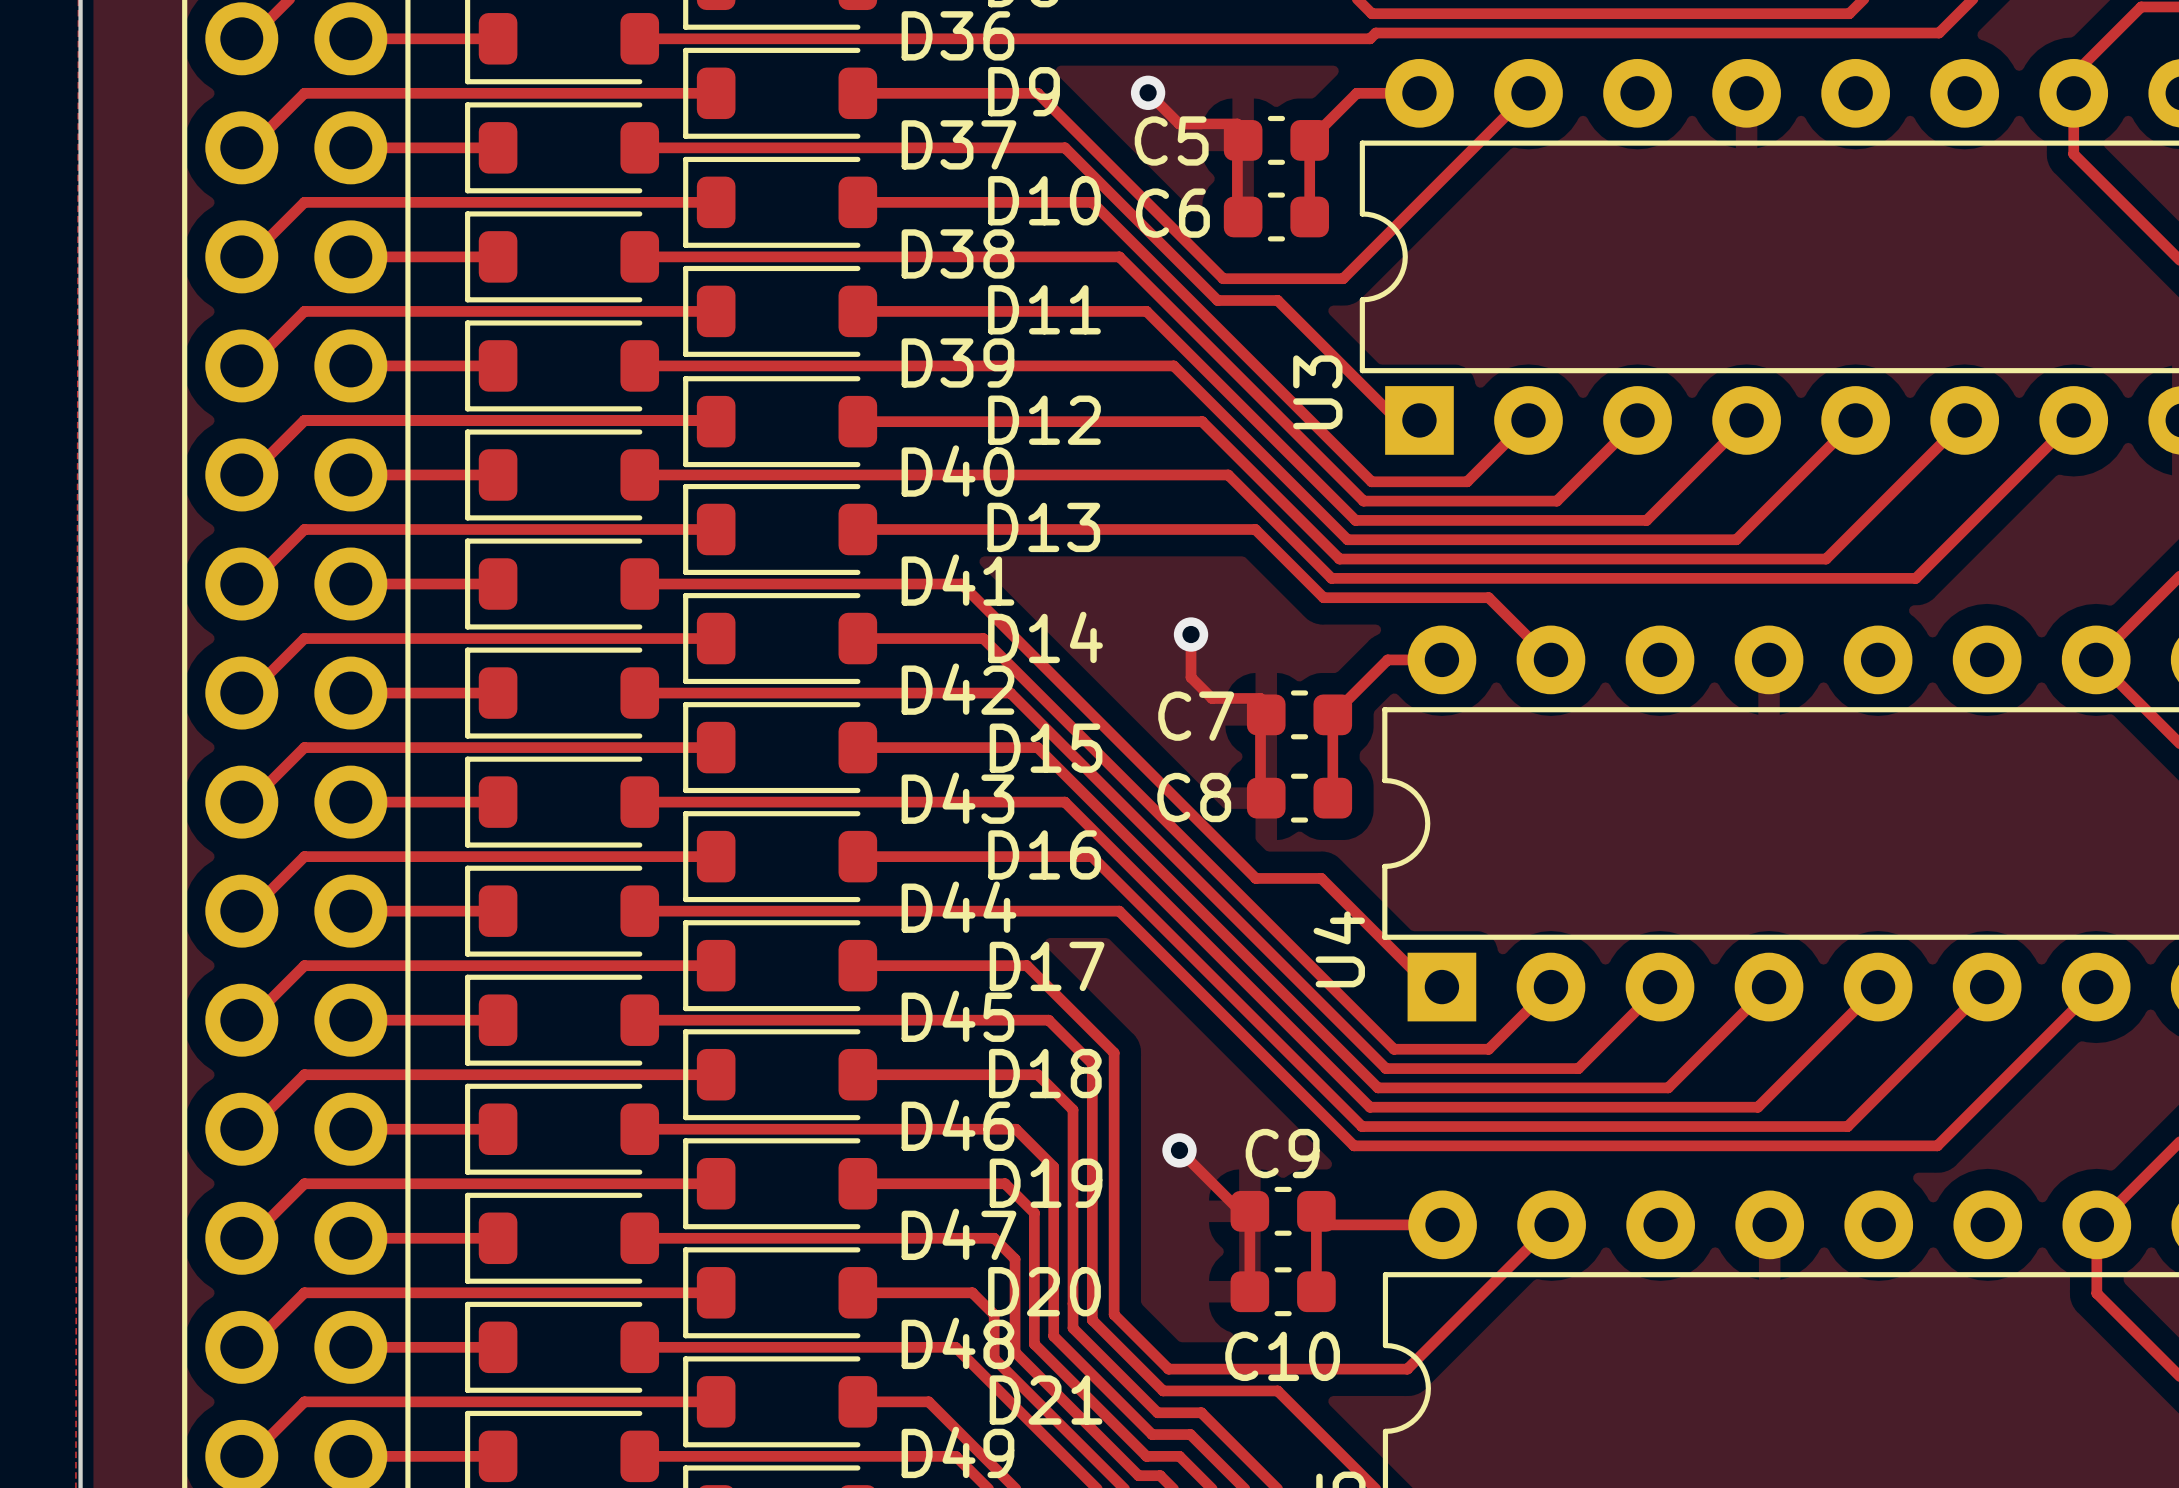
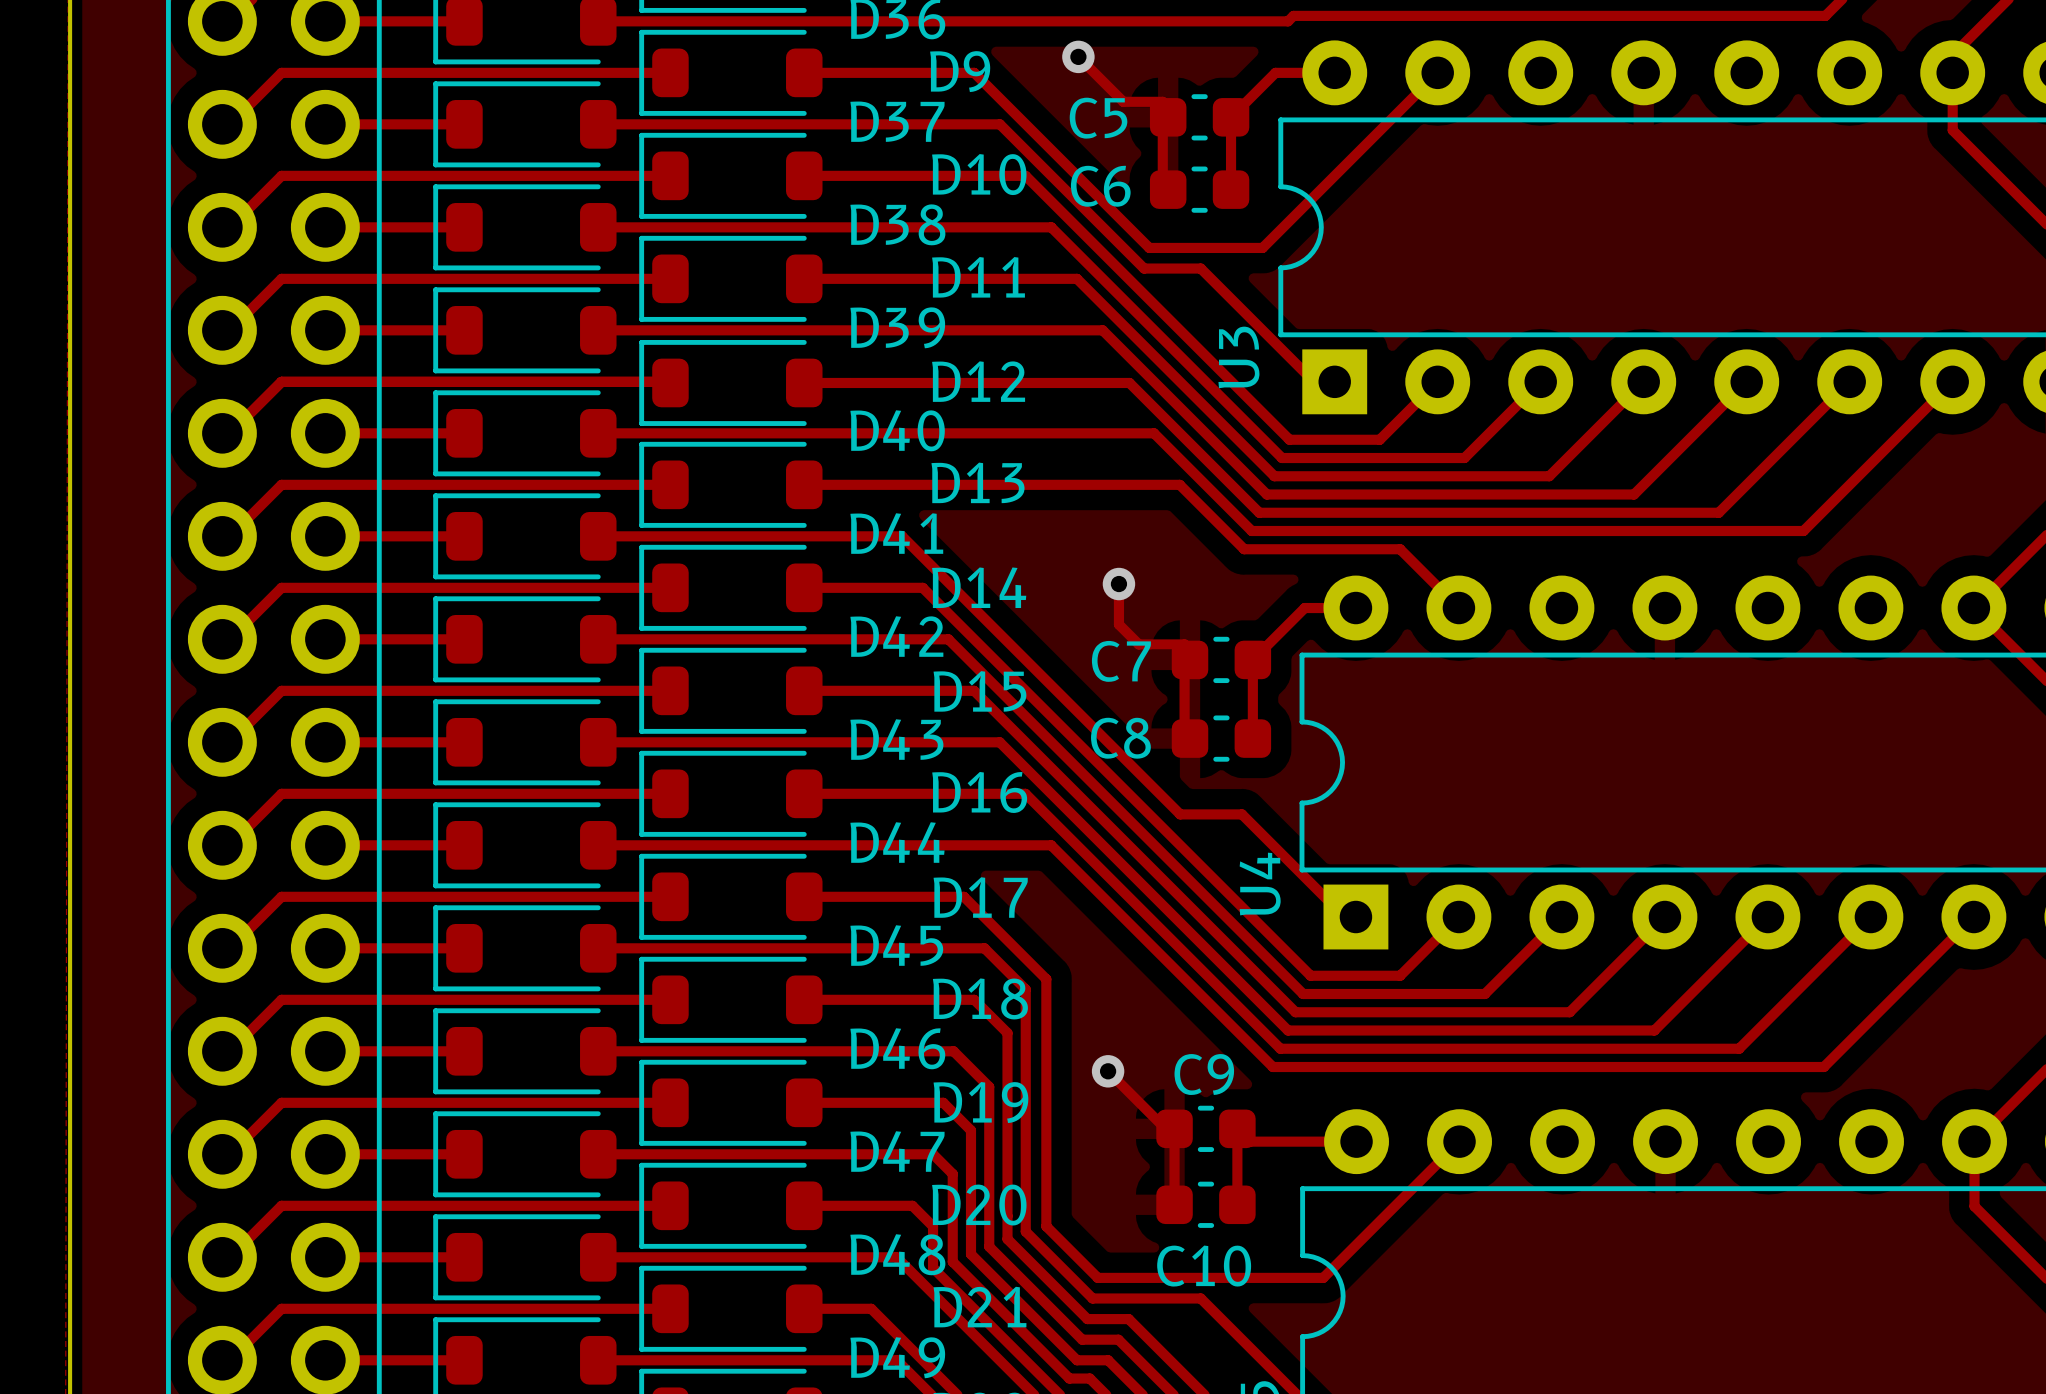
track: (1148, 92) (1179, 124) (1195, 124) -> (1078, 56) (1123, 101)
via position: (1148, 92) -> (1078, 56)

